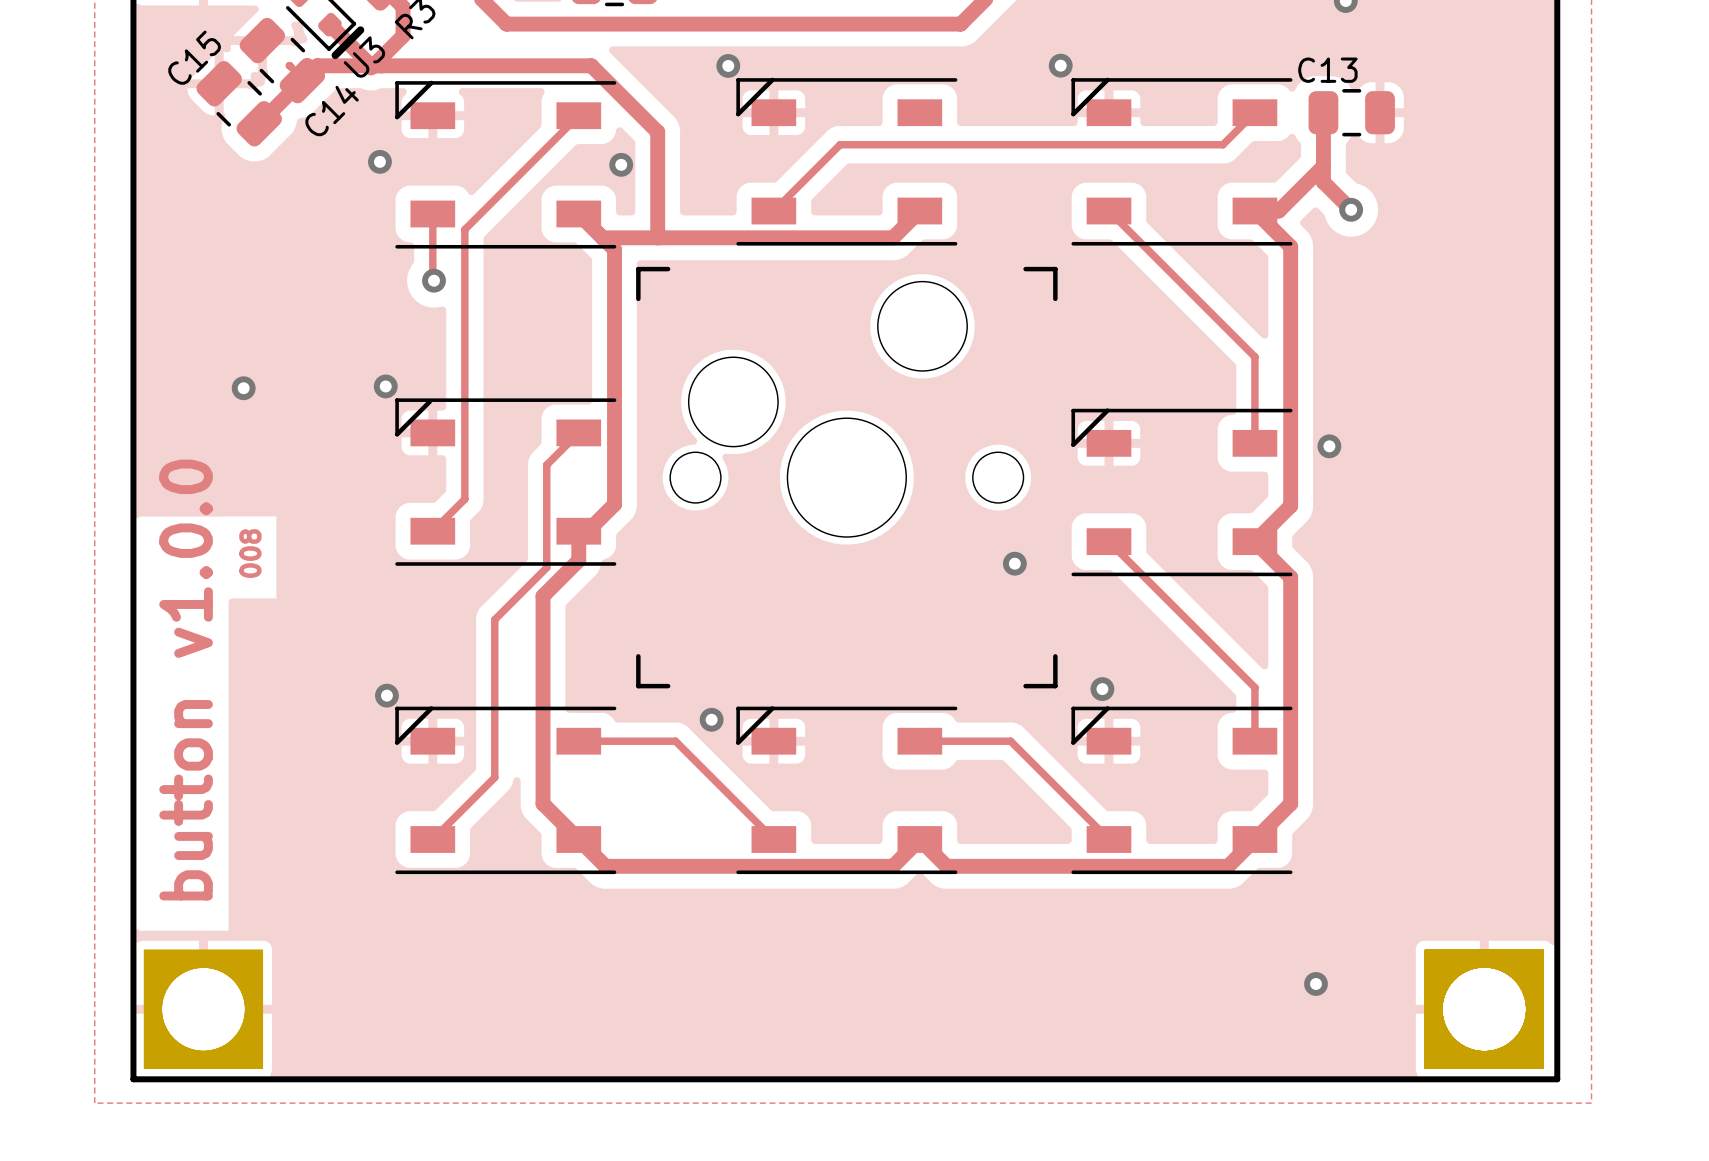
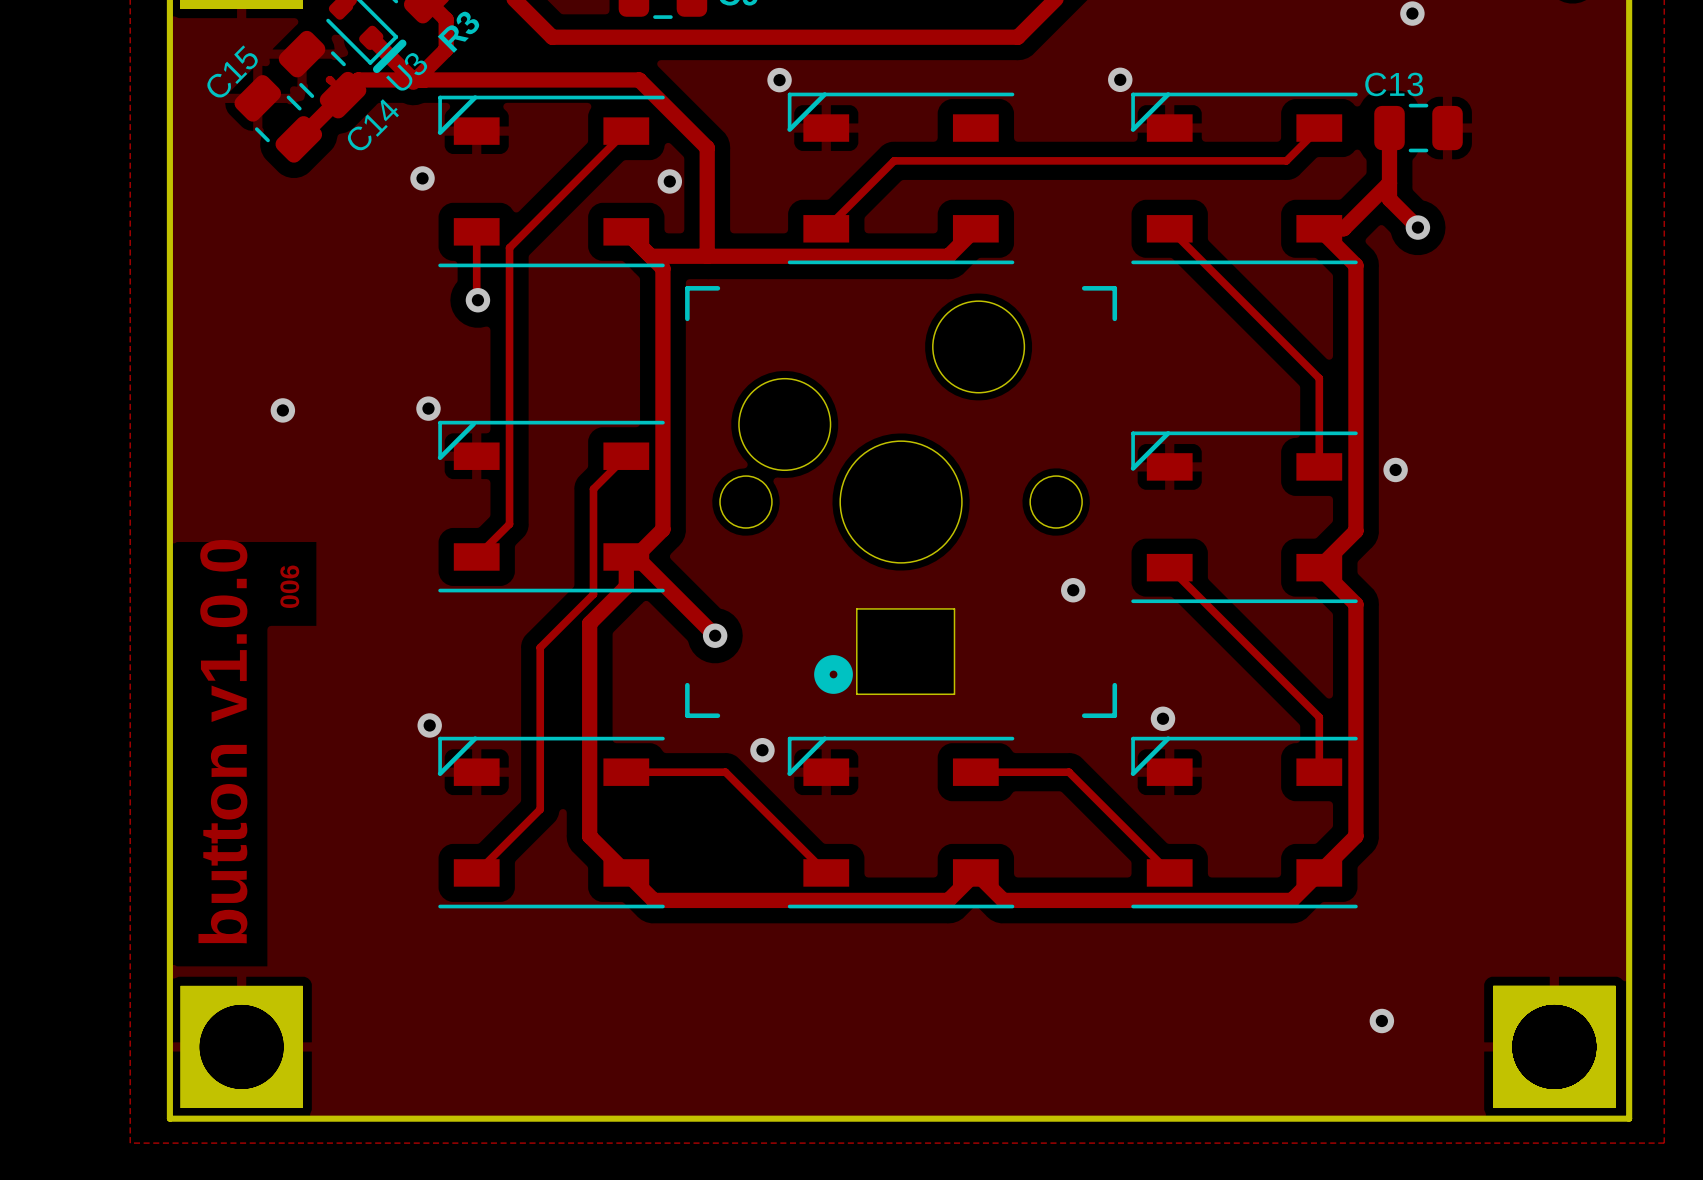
track: none -> (636, 556) (715, 635)
text: 008 (250, 553) -> 006 (289, 586)
via: none -> (715, 635)
part: none -> (884, 651)

